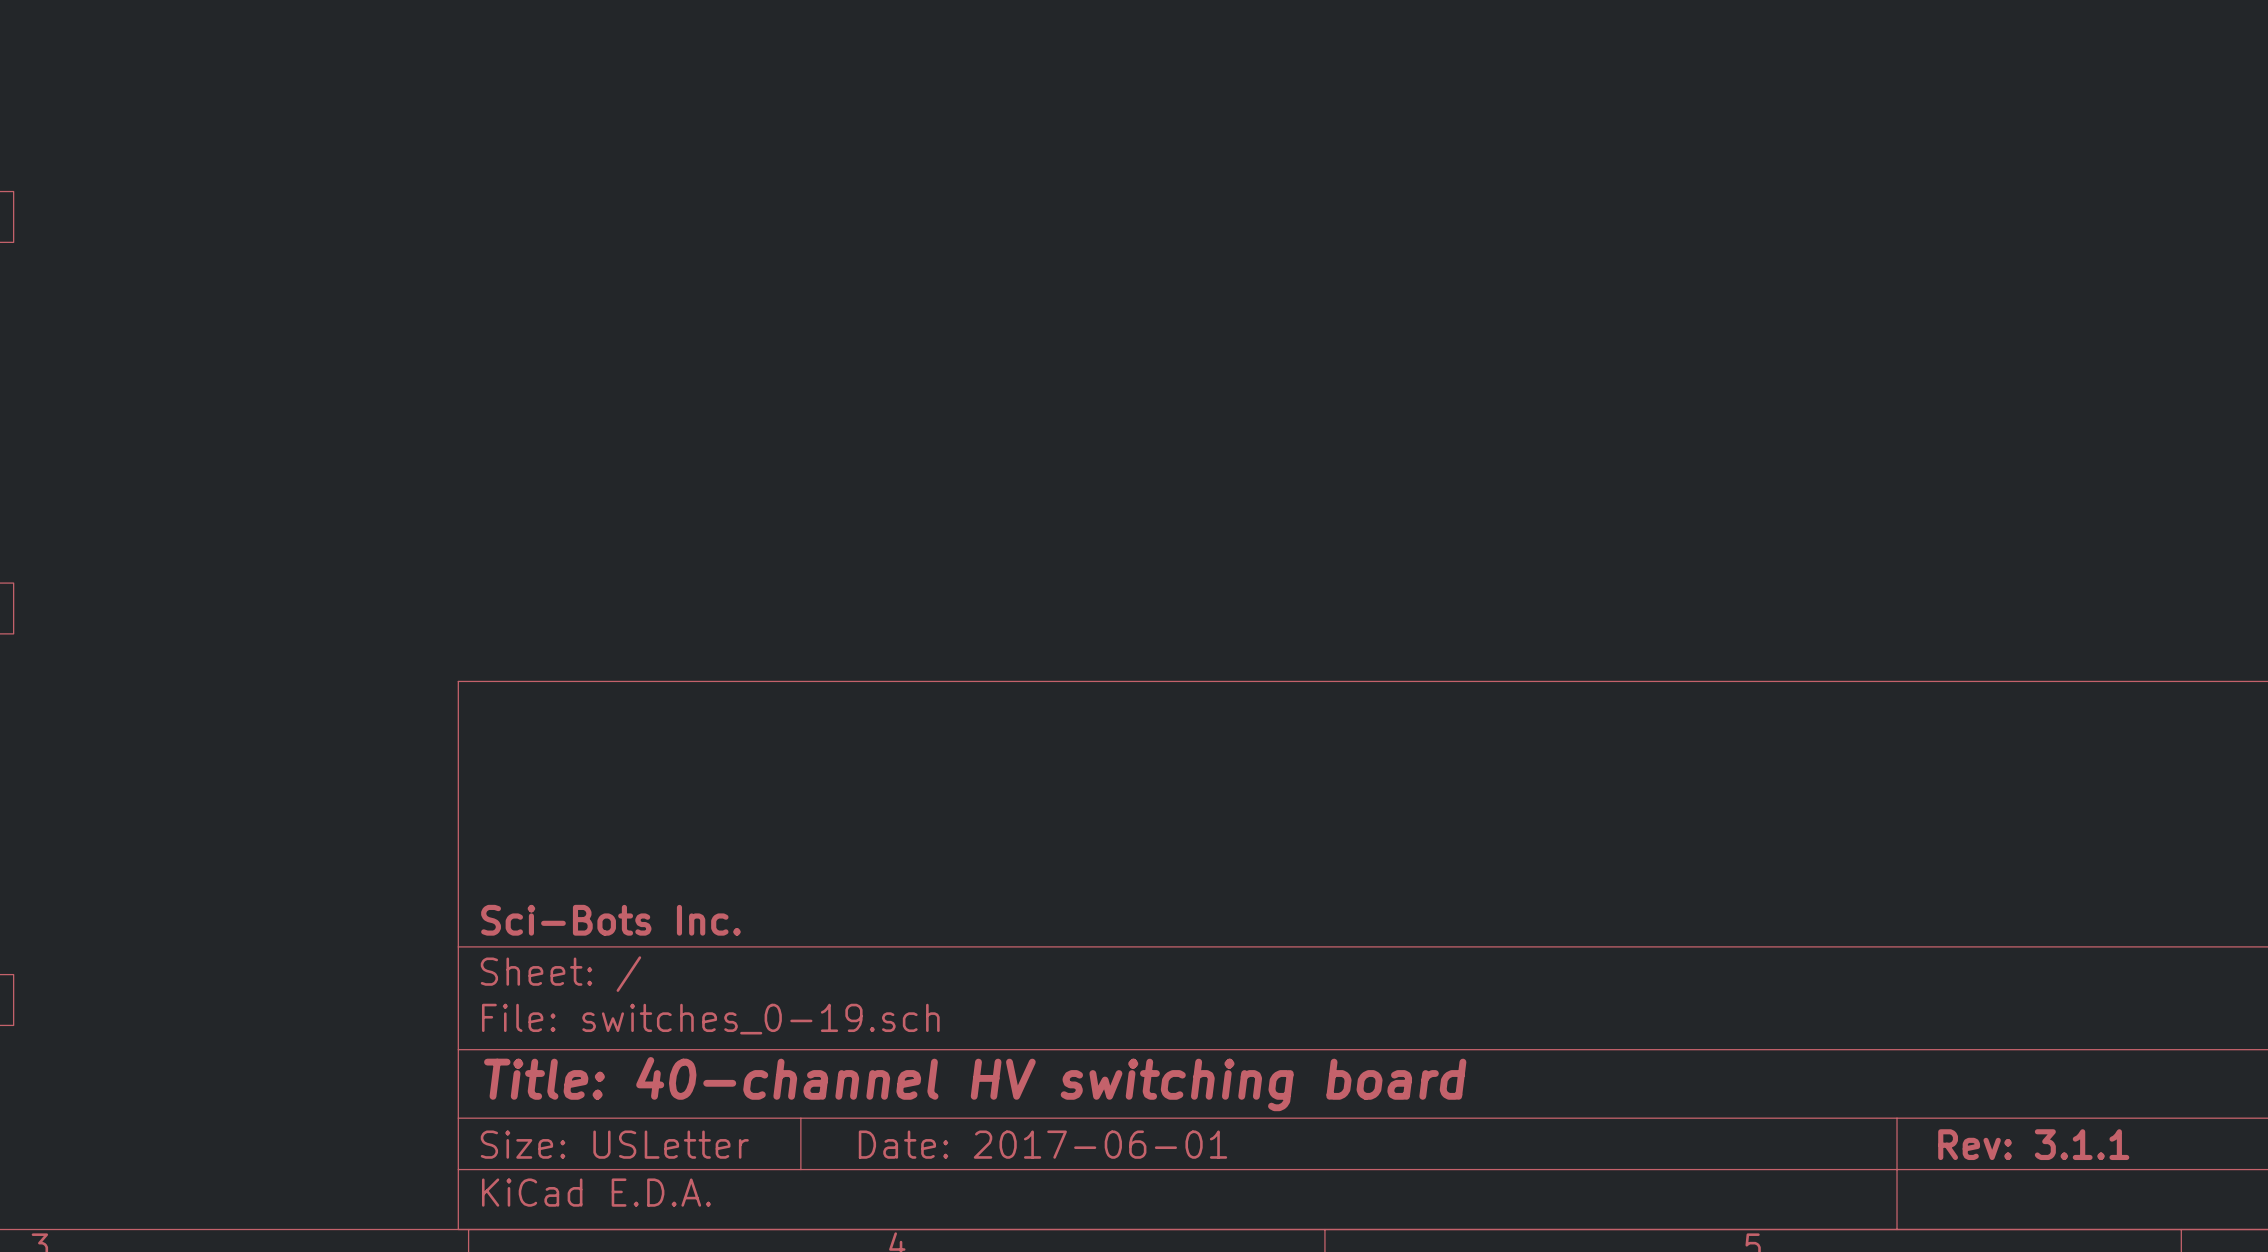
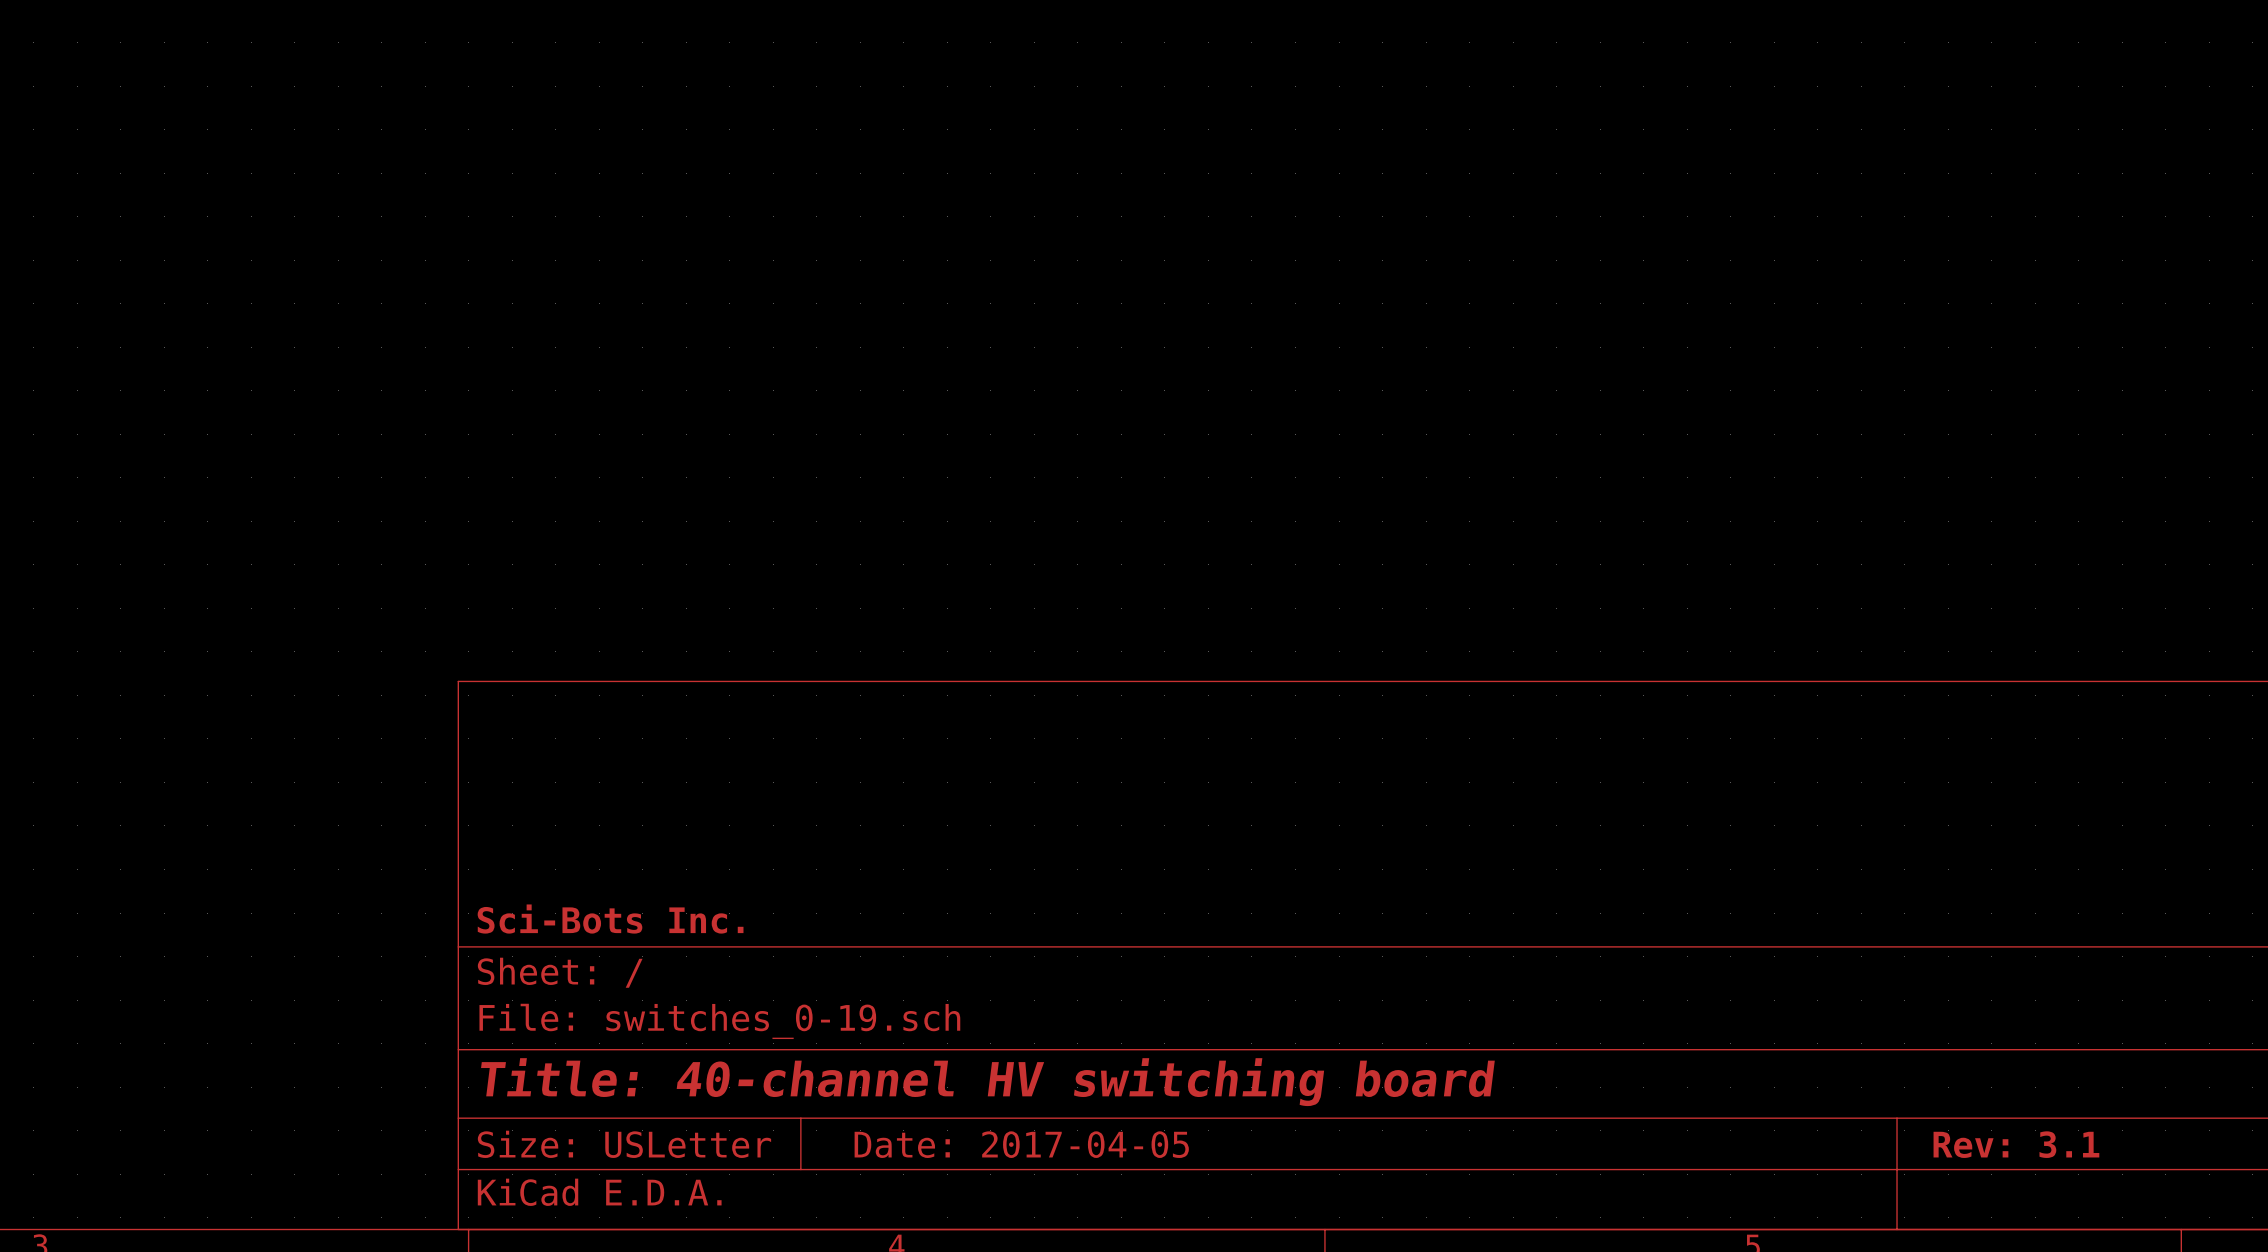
title block: Date: 2017-06-01 (1042, 1144) -> Date: 2017-04-05 (1021, 1144)
title block: Rev: 3.1.1 (2033, 1144) -> Rev: 3.1 (2016, 1144)

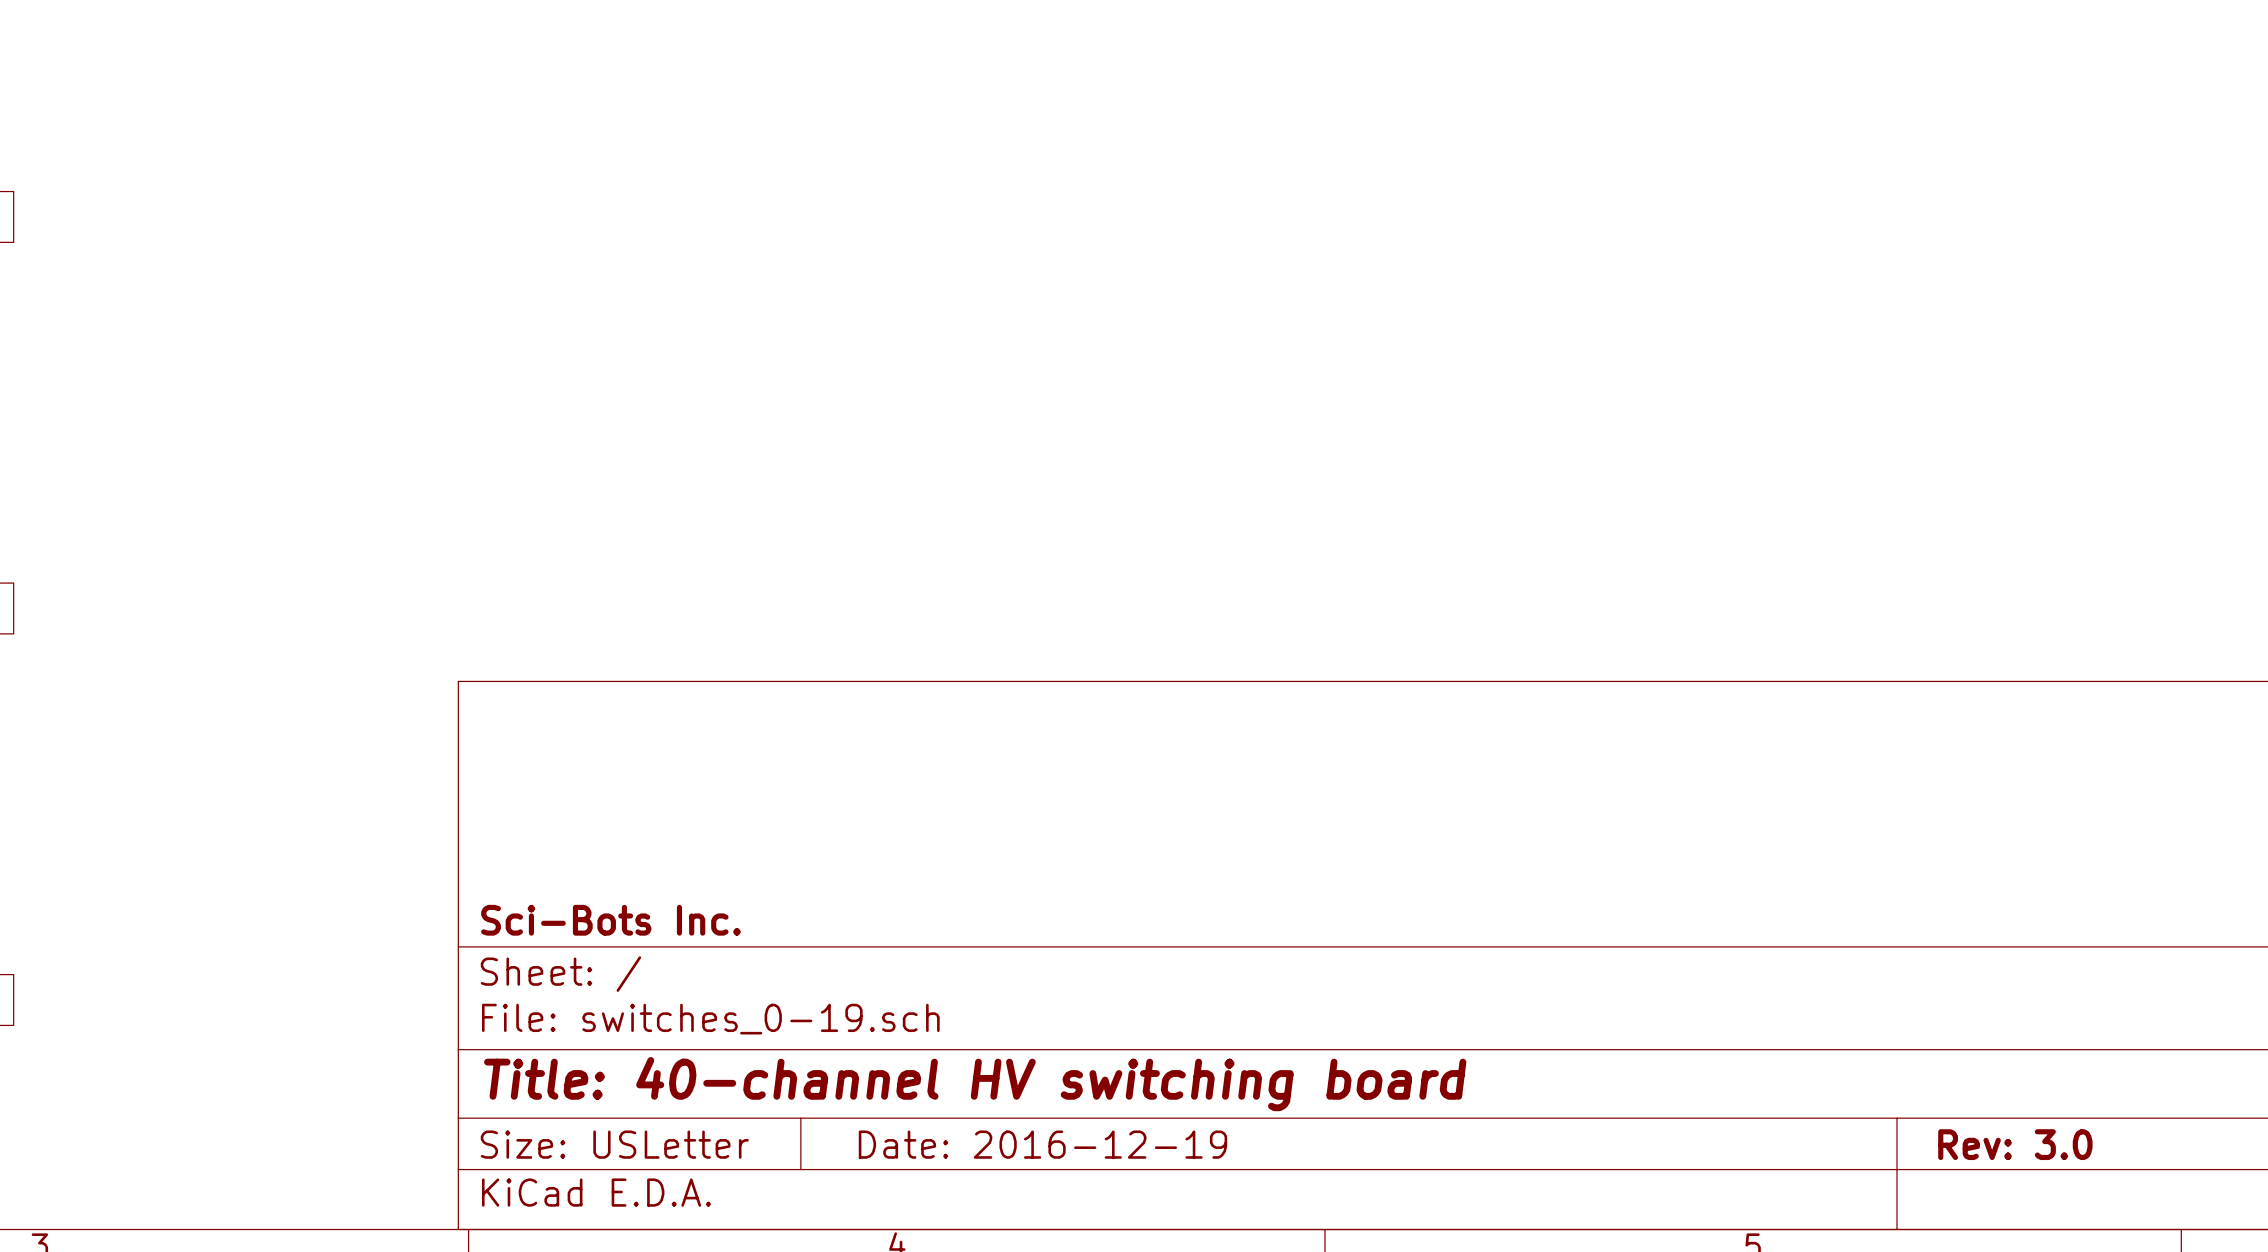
title block: Date: 2017-04-05 (1021, 1144) -> Date: 2016-12-19 (1042, 1144)
title block: Rev: 3.1 (2016, 1144) -> Rev: 3.0 (2015, 1144)

